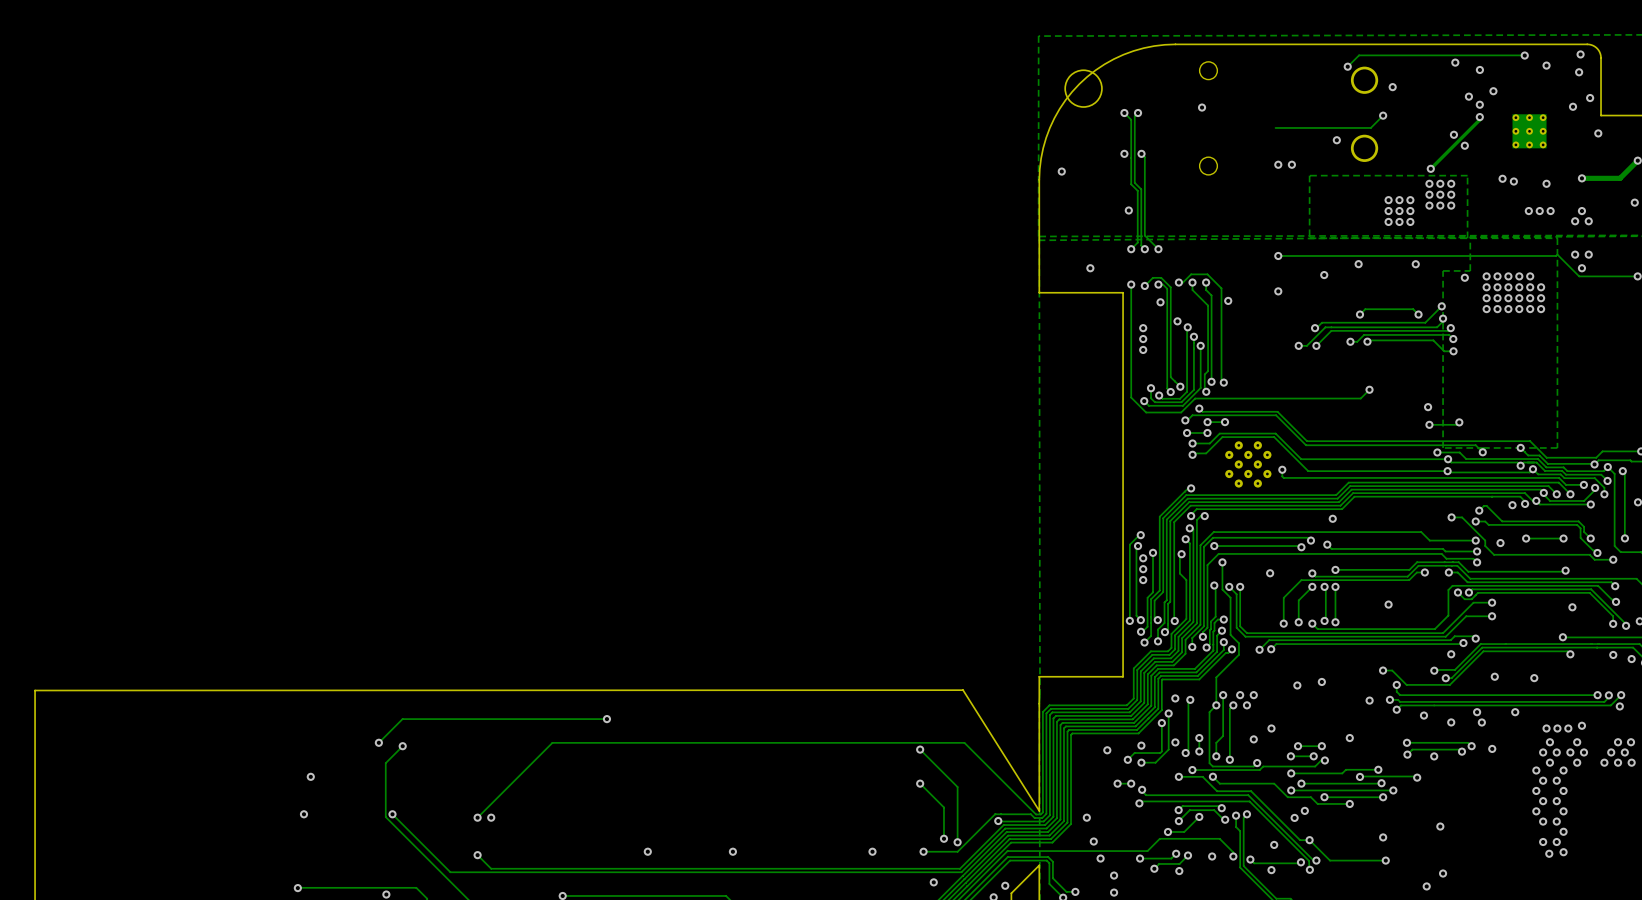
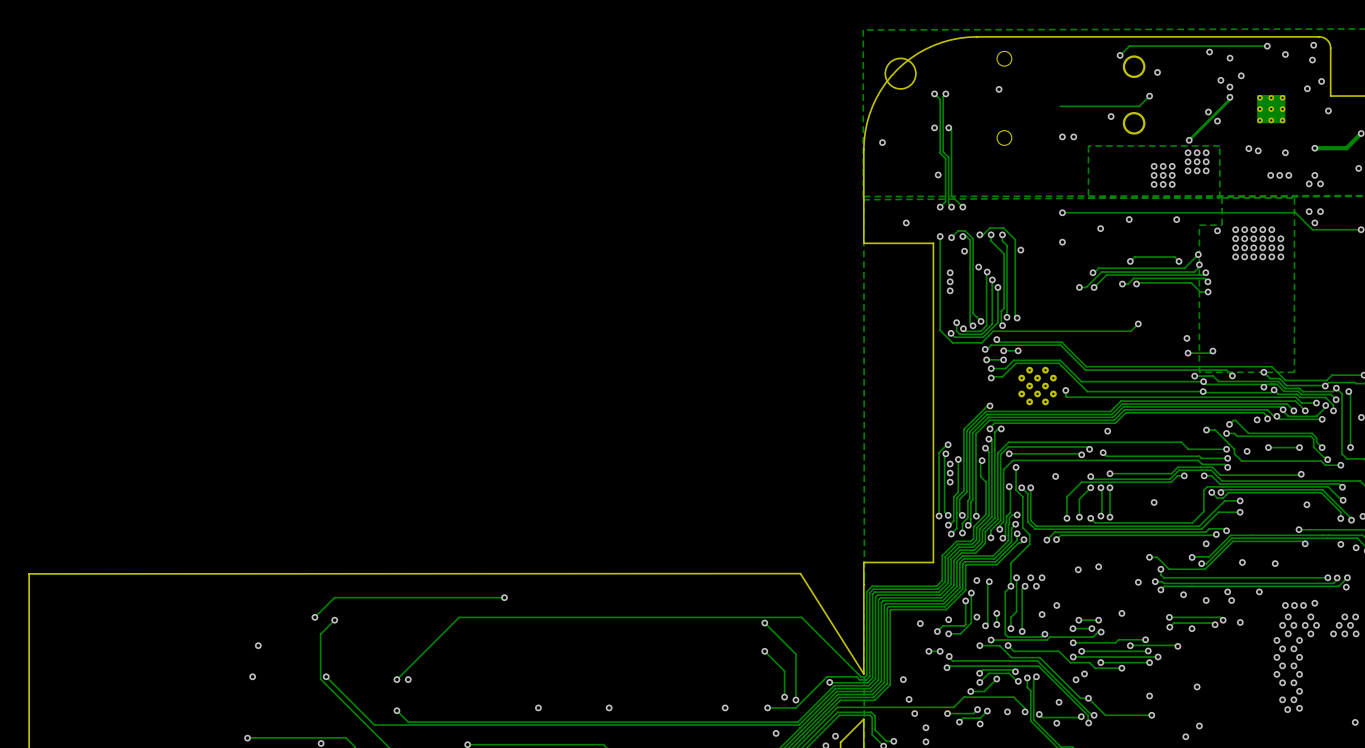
via: none -> (1355, 722)

